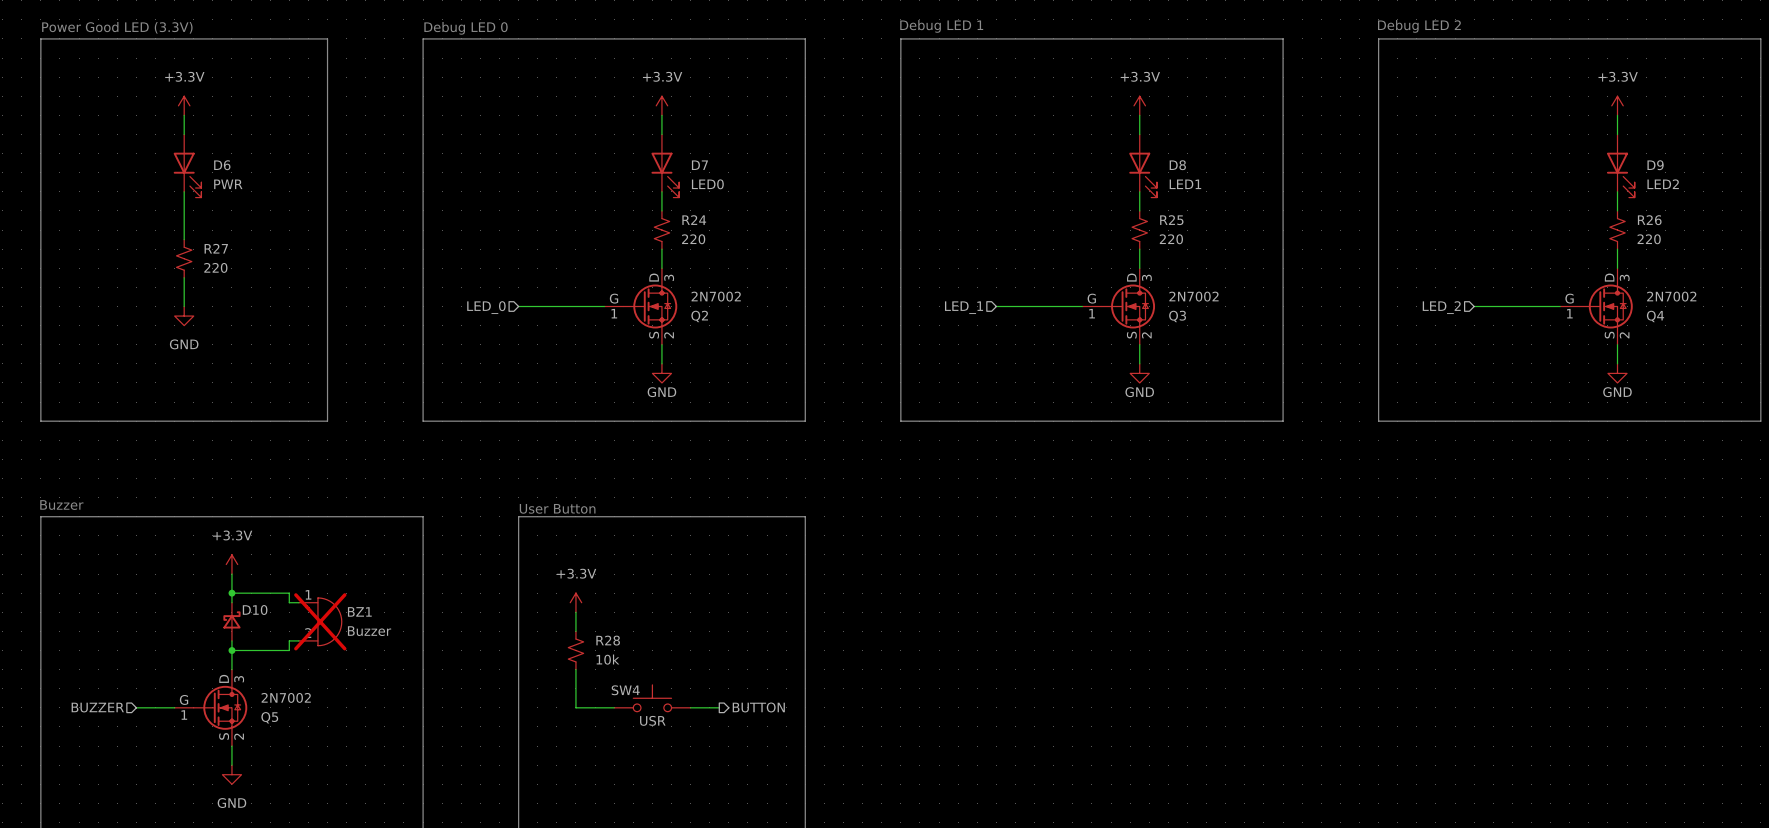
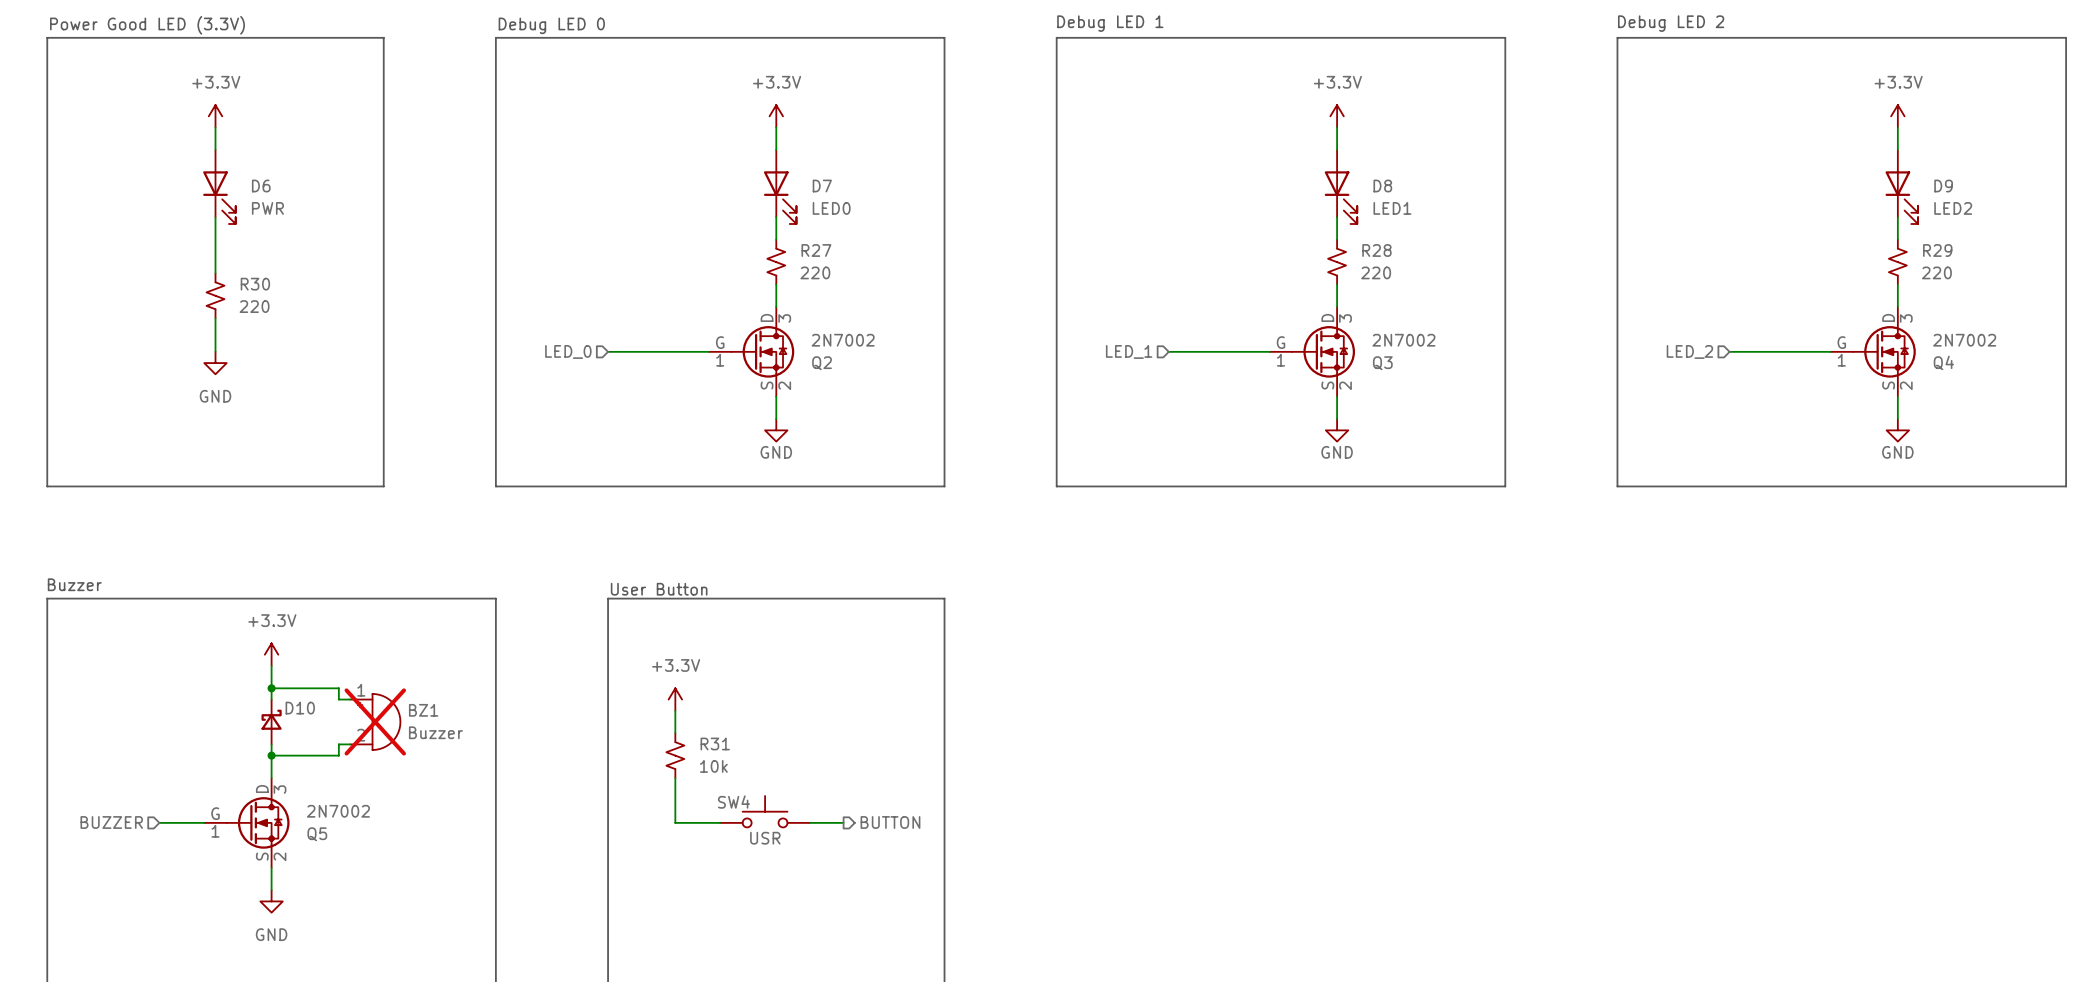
R24 name: R24 (694, 220) -> R27 (816, 250)
R25 name: R25 (1171, 220) -> R28 (1376, 250)
R26 name: R26 (1649, 220) -> R29 (1937, 250)
R27 name: R27 (216, 248) -> R30 (255, 284)
R28 name: R28 (608, 640) -> R31 (715, 743)

